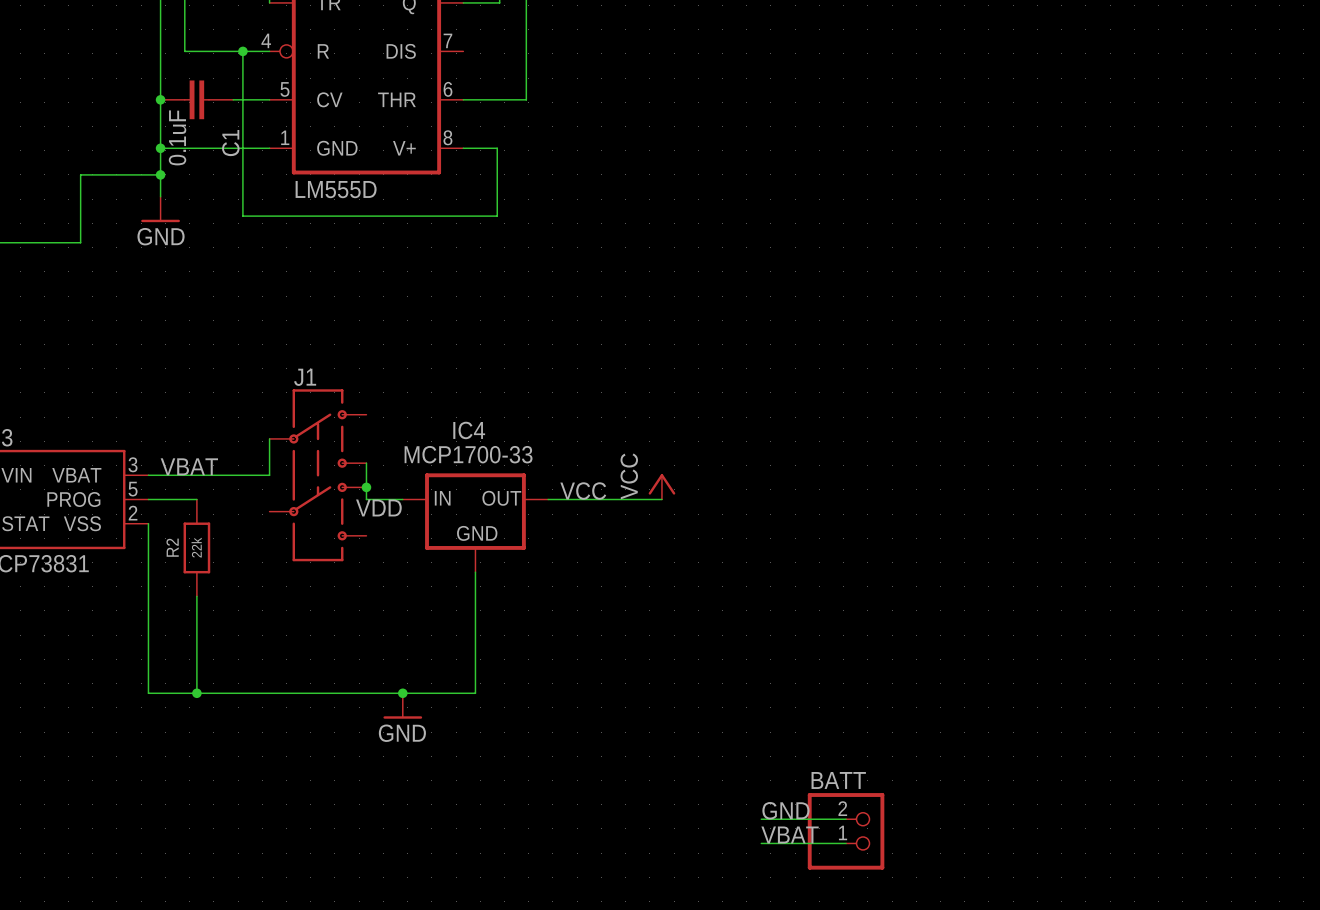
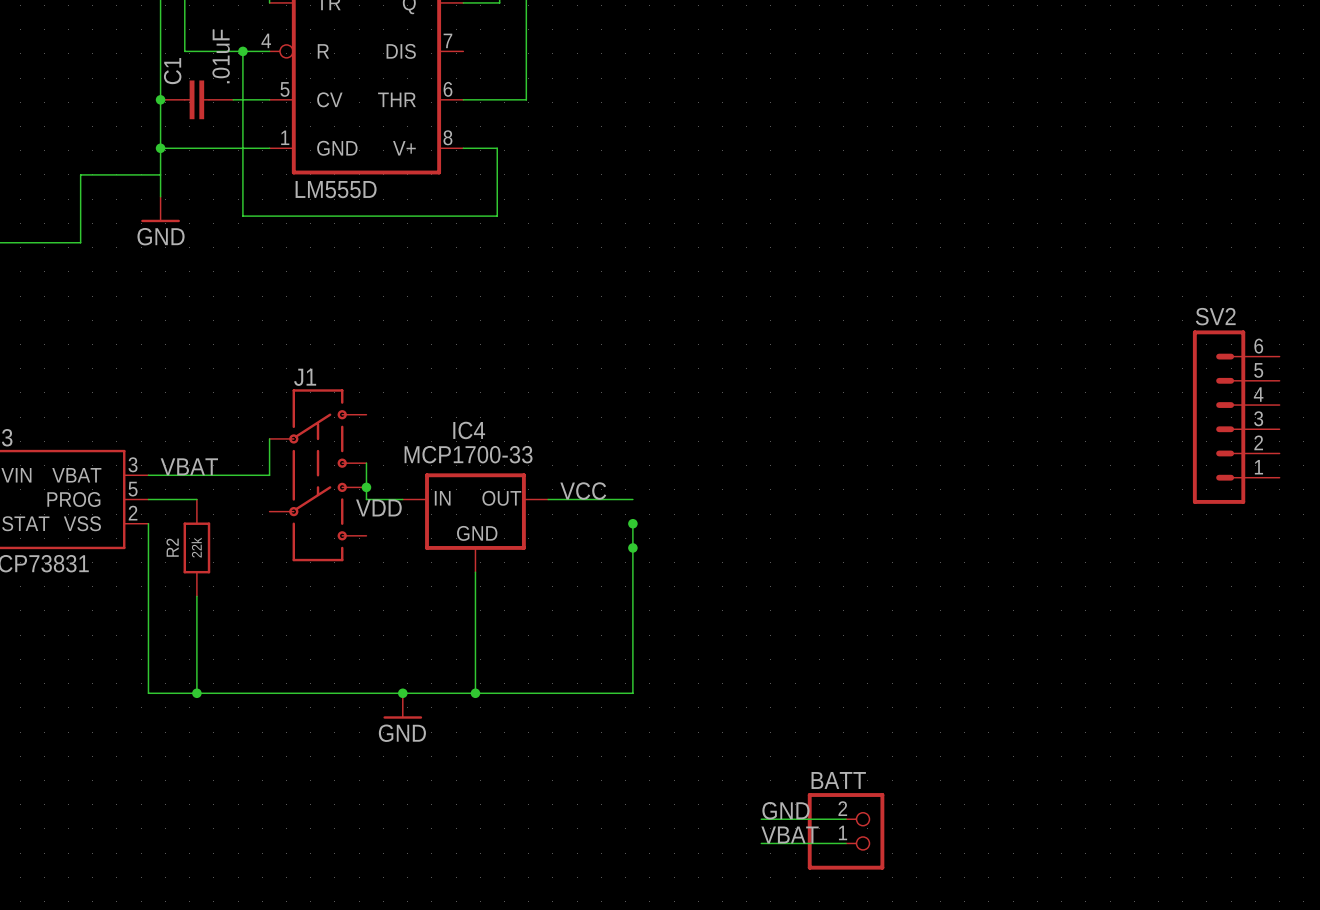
C1 value: 0.1uF (177, 137) -> .01uF (221, 56)
C1 name position: C1 (230, 143) -> C1 (172, 71)
junction: (160, 174) -> none
SV2: none -> (1236, 417)
power symbol: VCC (661, 486) -> none
wire: (632, 499) (661, 499) -> none
wire: none -> (632, 523) (632, 693) (475, 693)
junction: none -> (632, 523)
junction: none -> (632, 547)
junction: none -> (475, 693)

